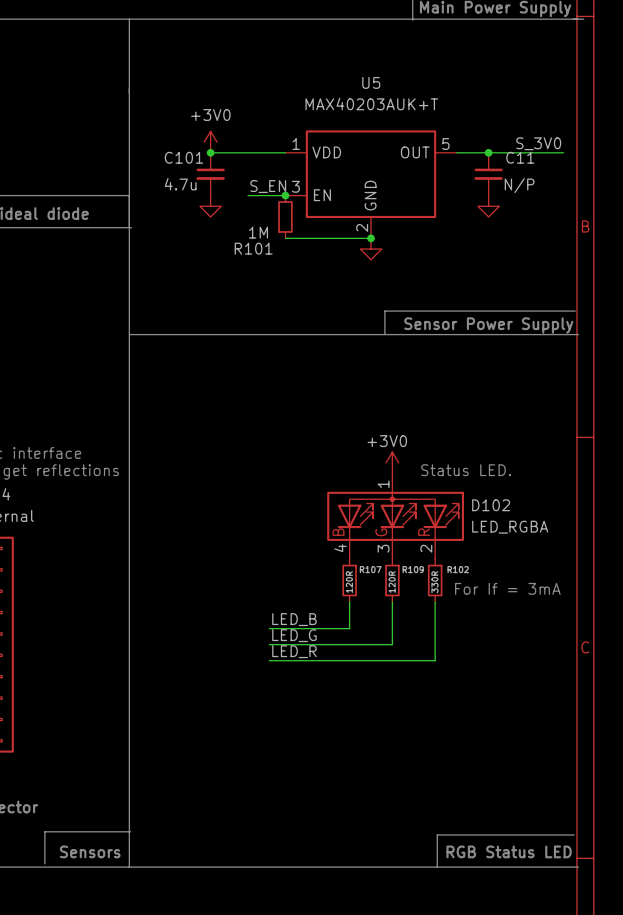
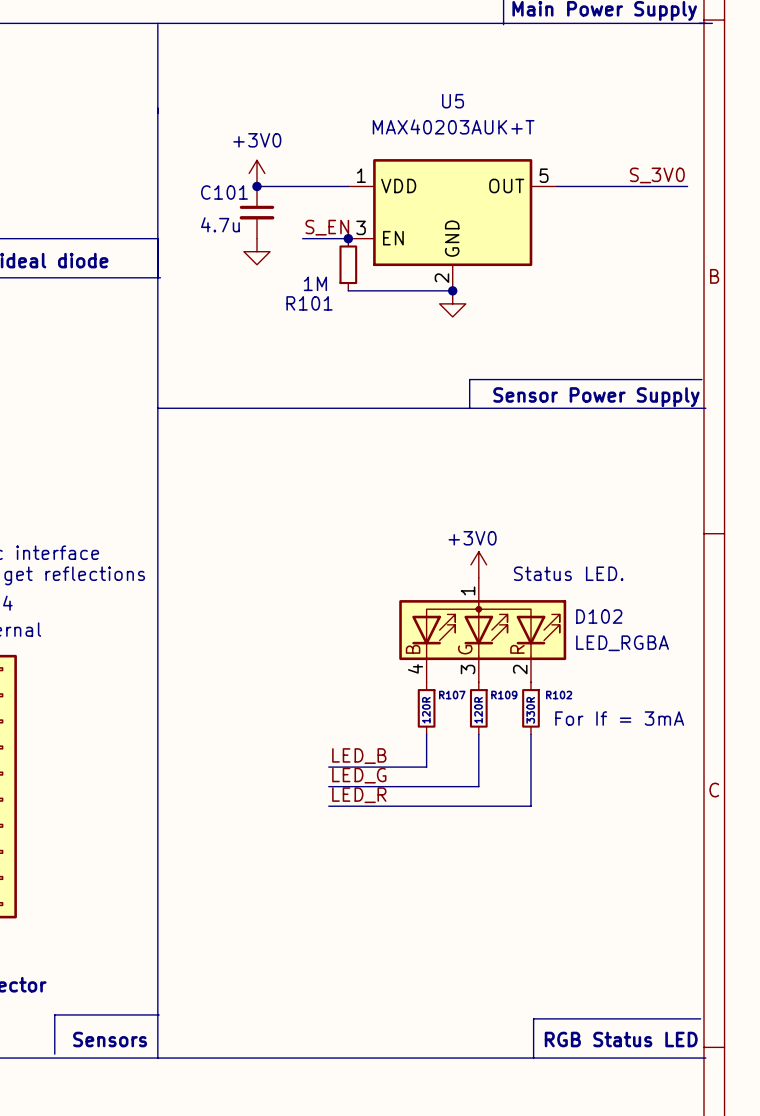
junction: (488, 152) -> none
C11: N/P (488, 174) -> none
power symbol: (488, 206) -> none

